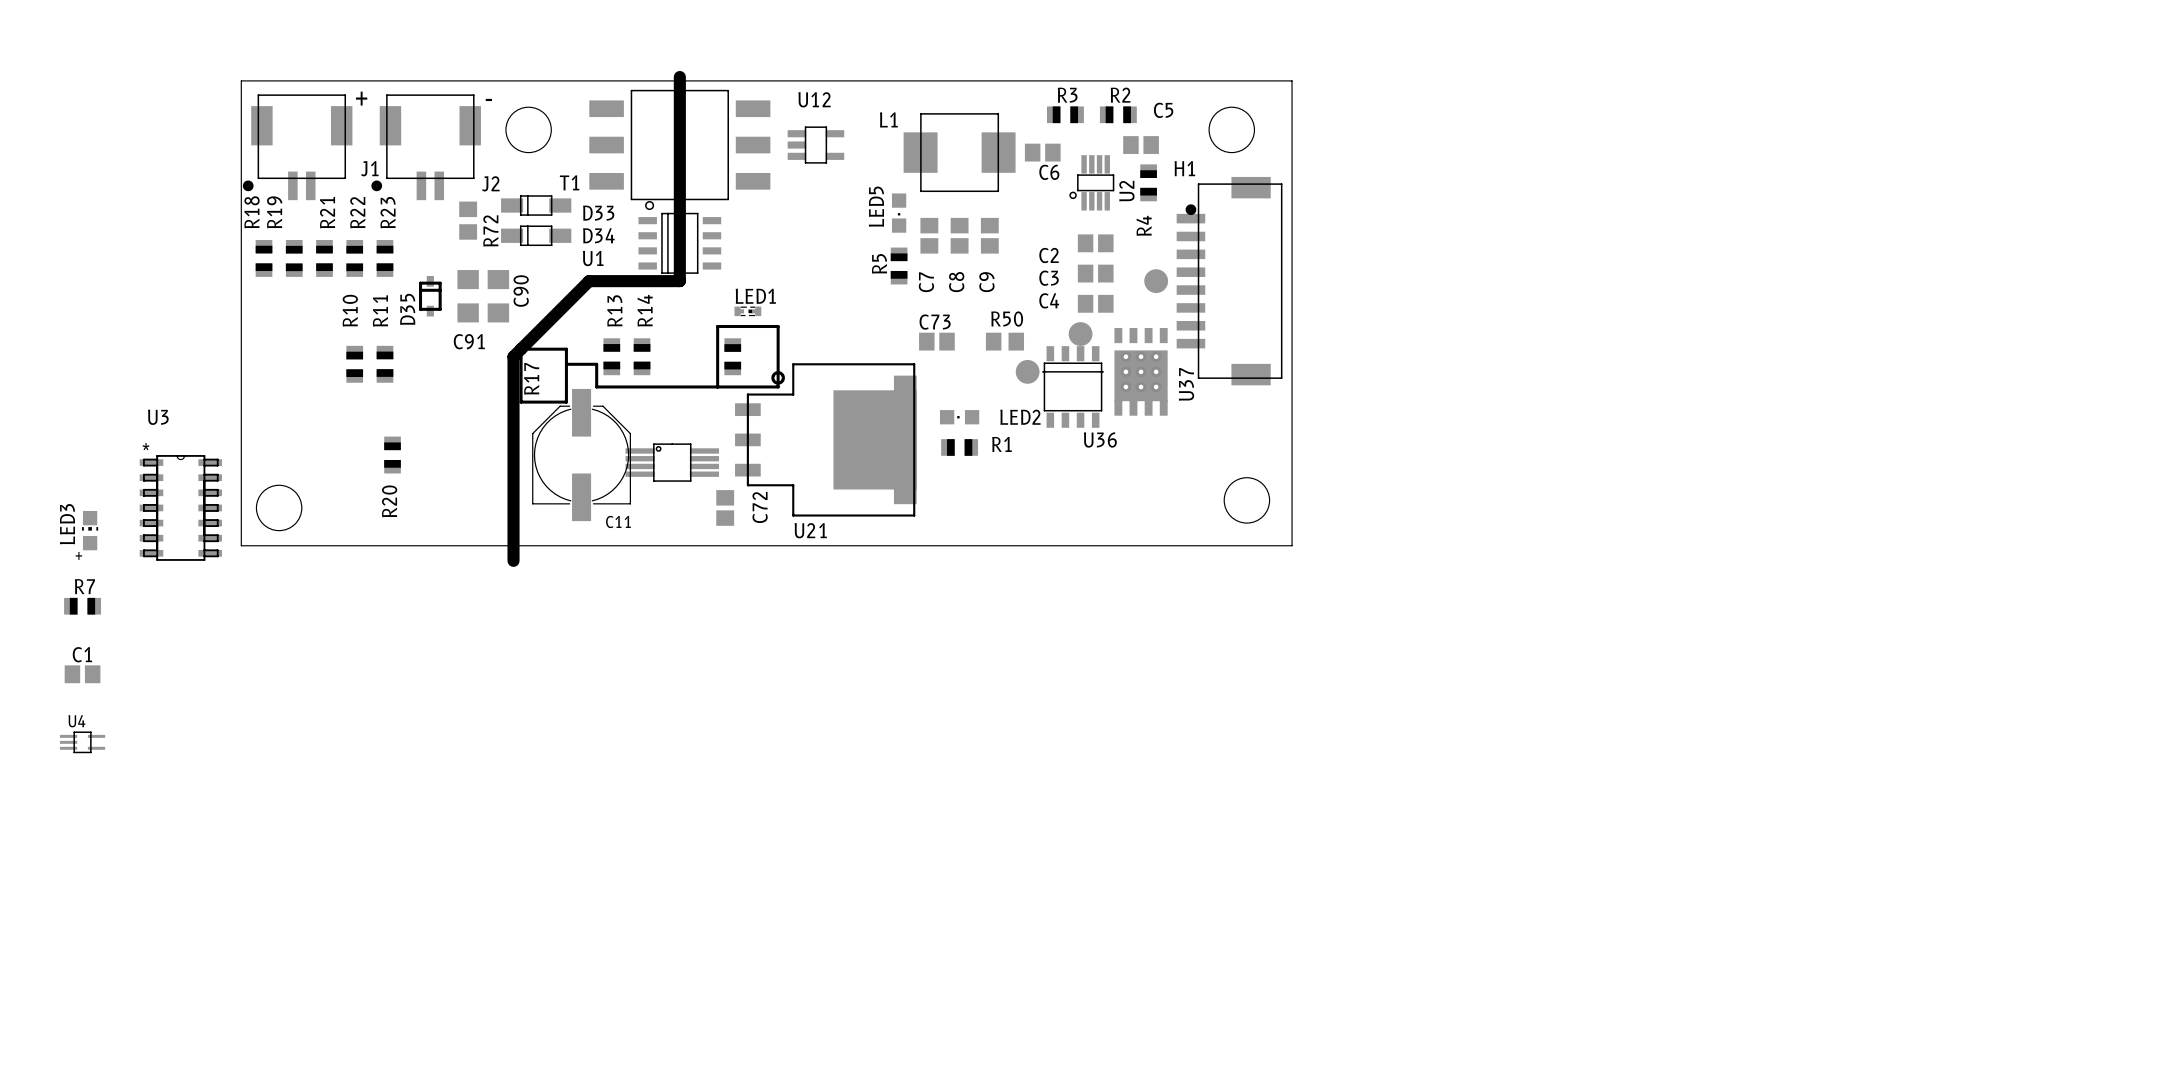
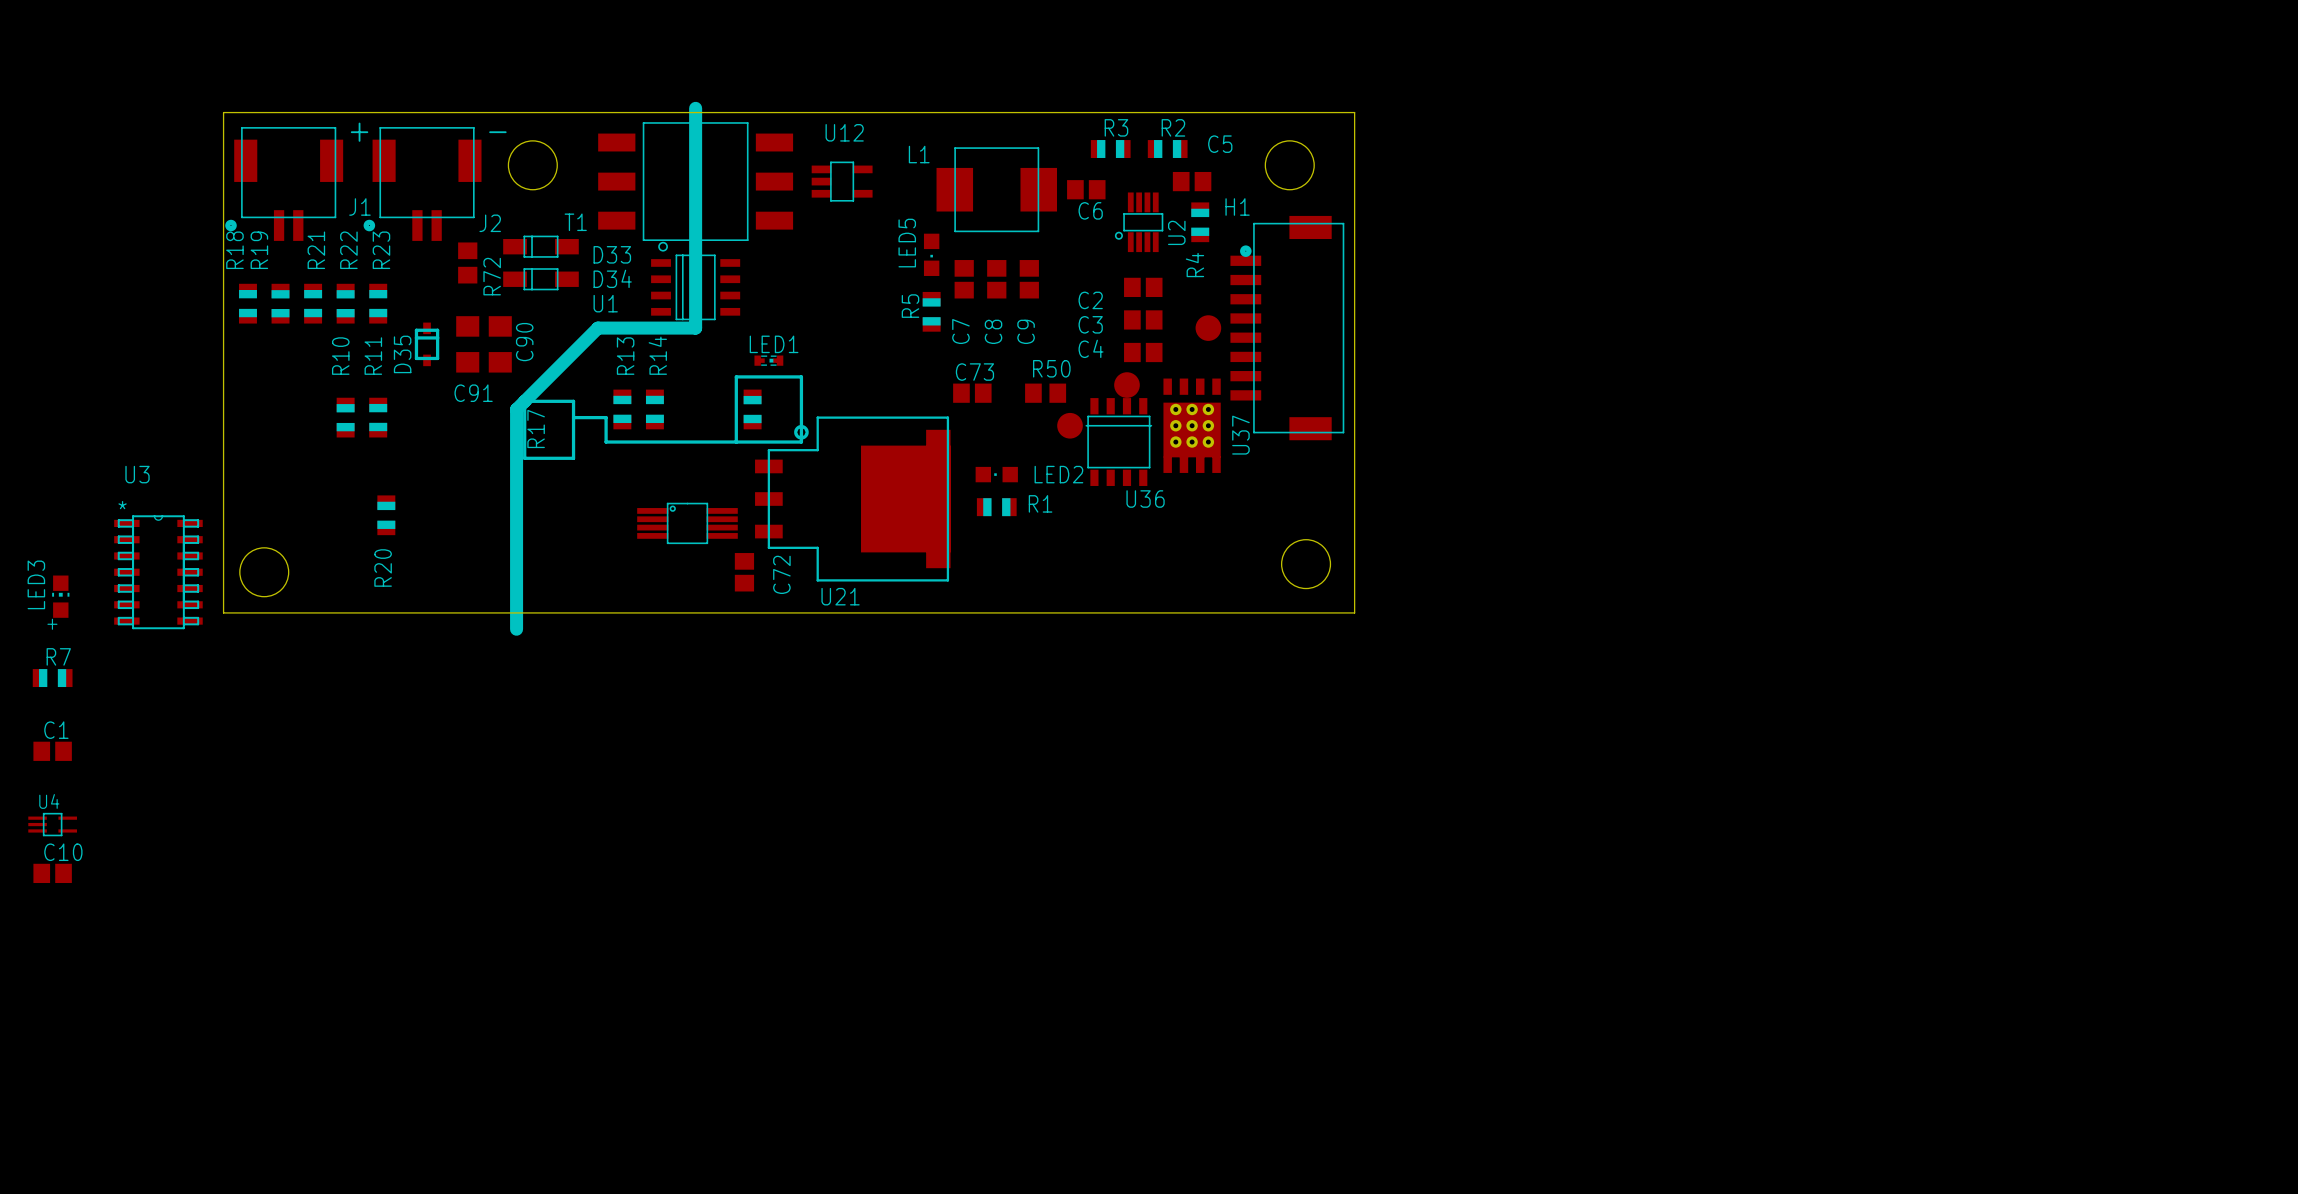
C11: (581, 455) -> none
C10: none -> (52, 873)

